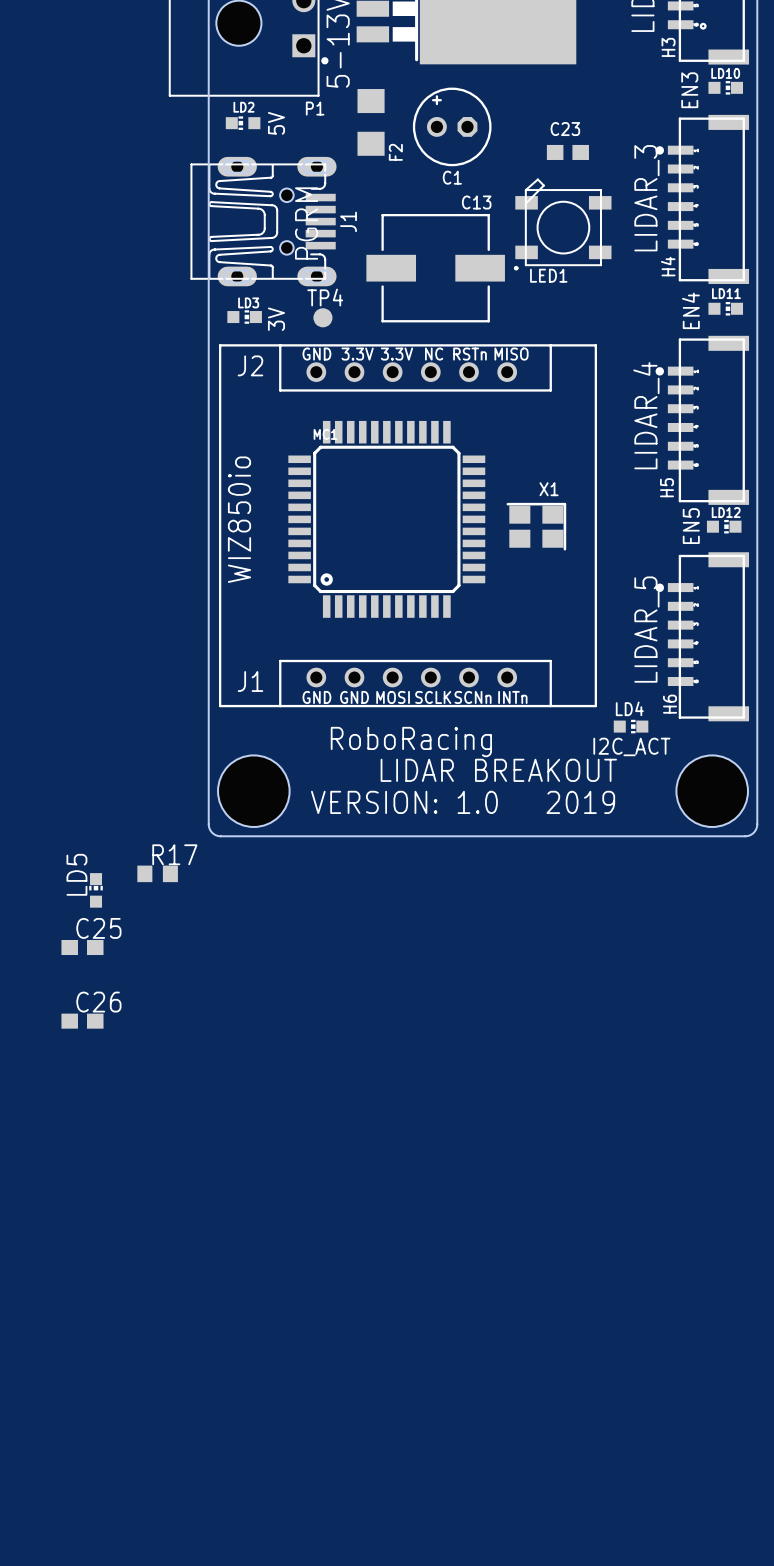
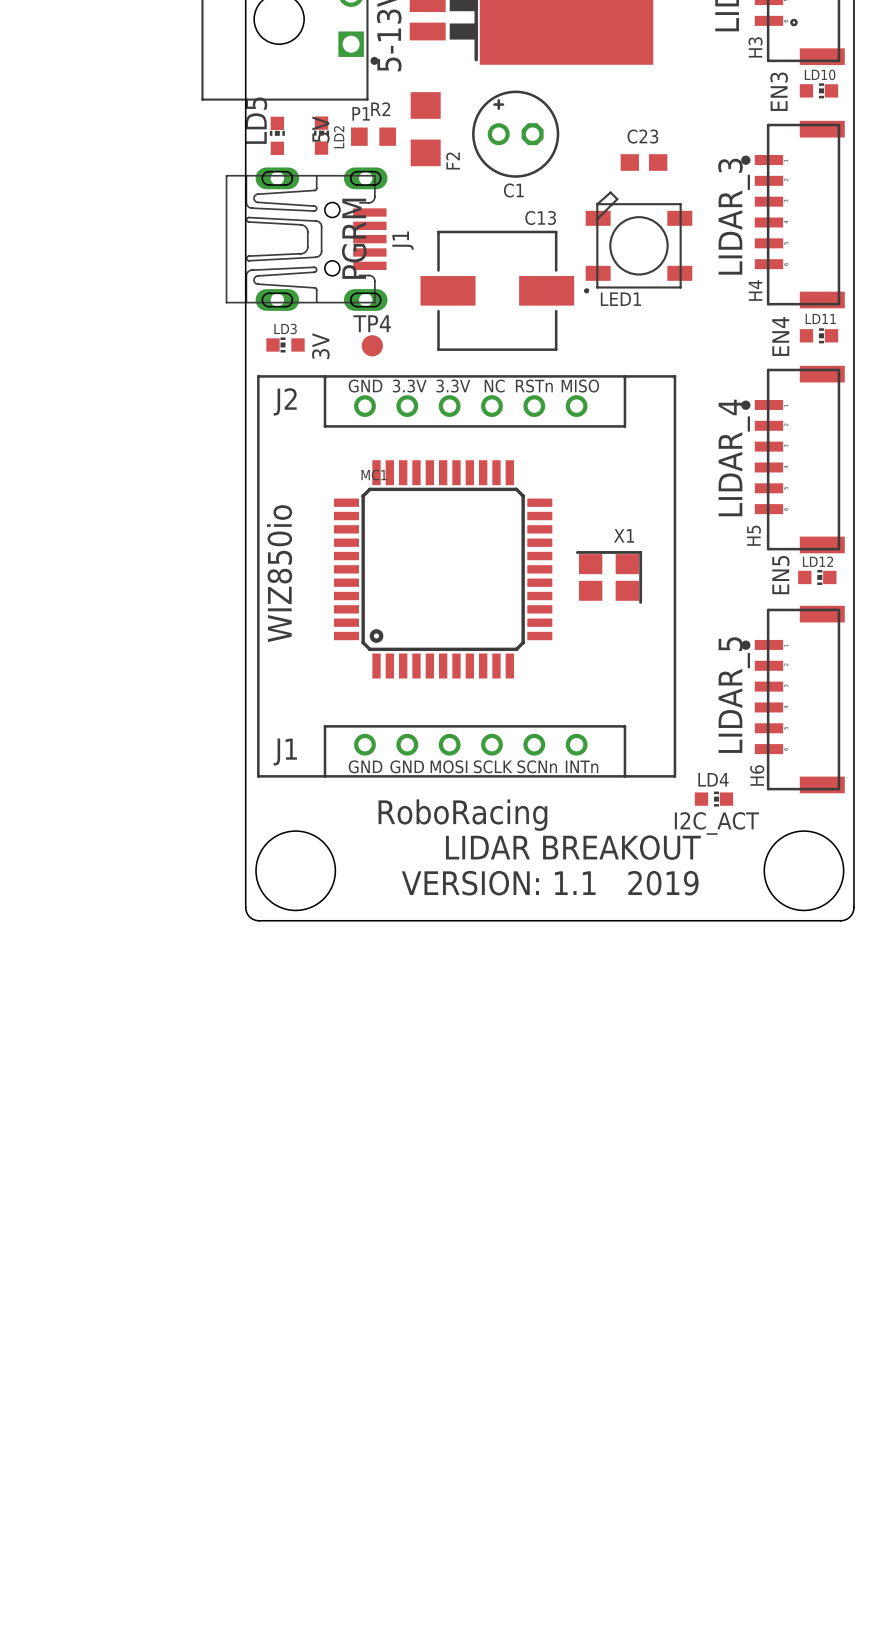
LD2 rotation: 0° (243, 123) -> 90° clockwise (321, 135)
LD2 position: (243, 123) -> (321, 135)
R2: none -> (373, 136)
LD3 rotation: 0° (244, 317) -> 180° (285, 344)
text: VERSION: 1.0 2019 (463, 802) -> VERSION: 1.1 2019 (550, 883)
R17: (157, 873) -> none
LD5 position: (96, 890) -> (277, 135)
C25: (82, 947) -> none
C26: (82, 1021) -> none

